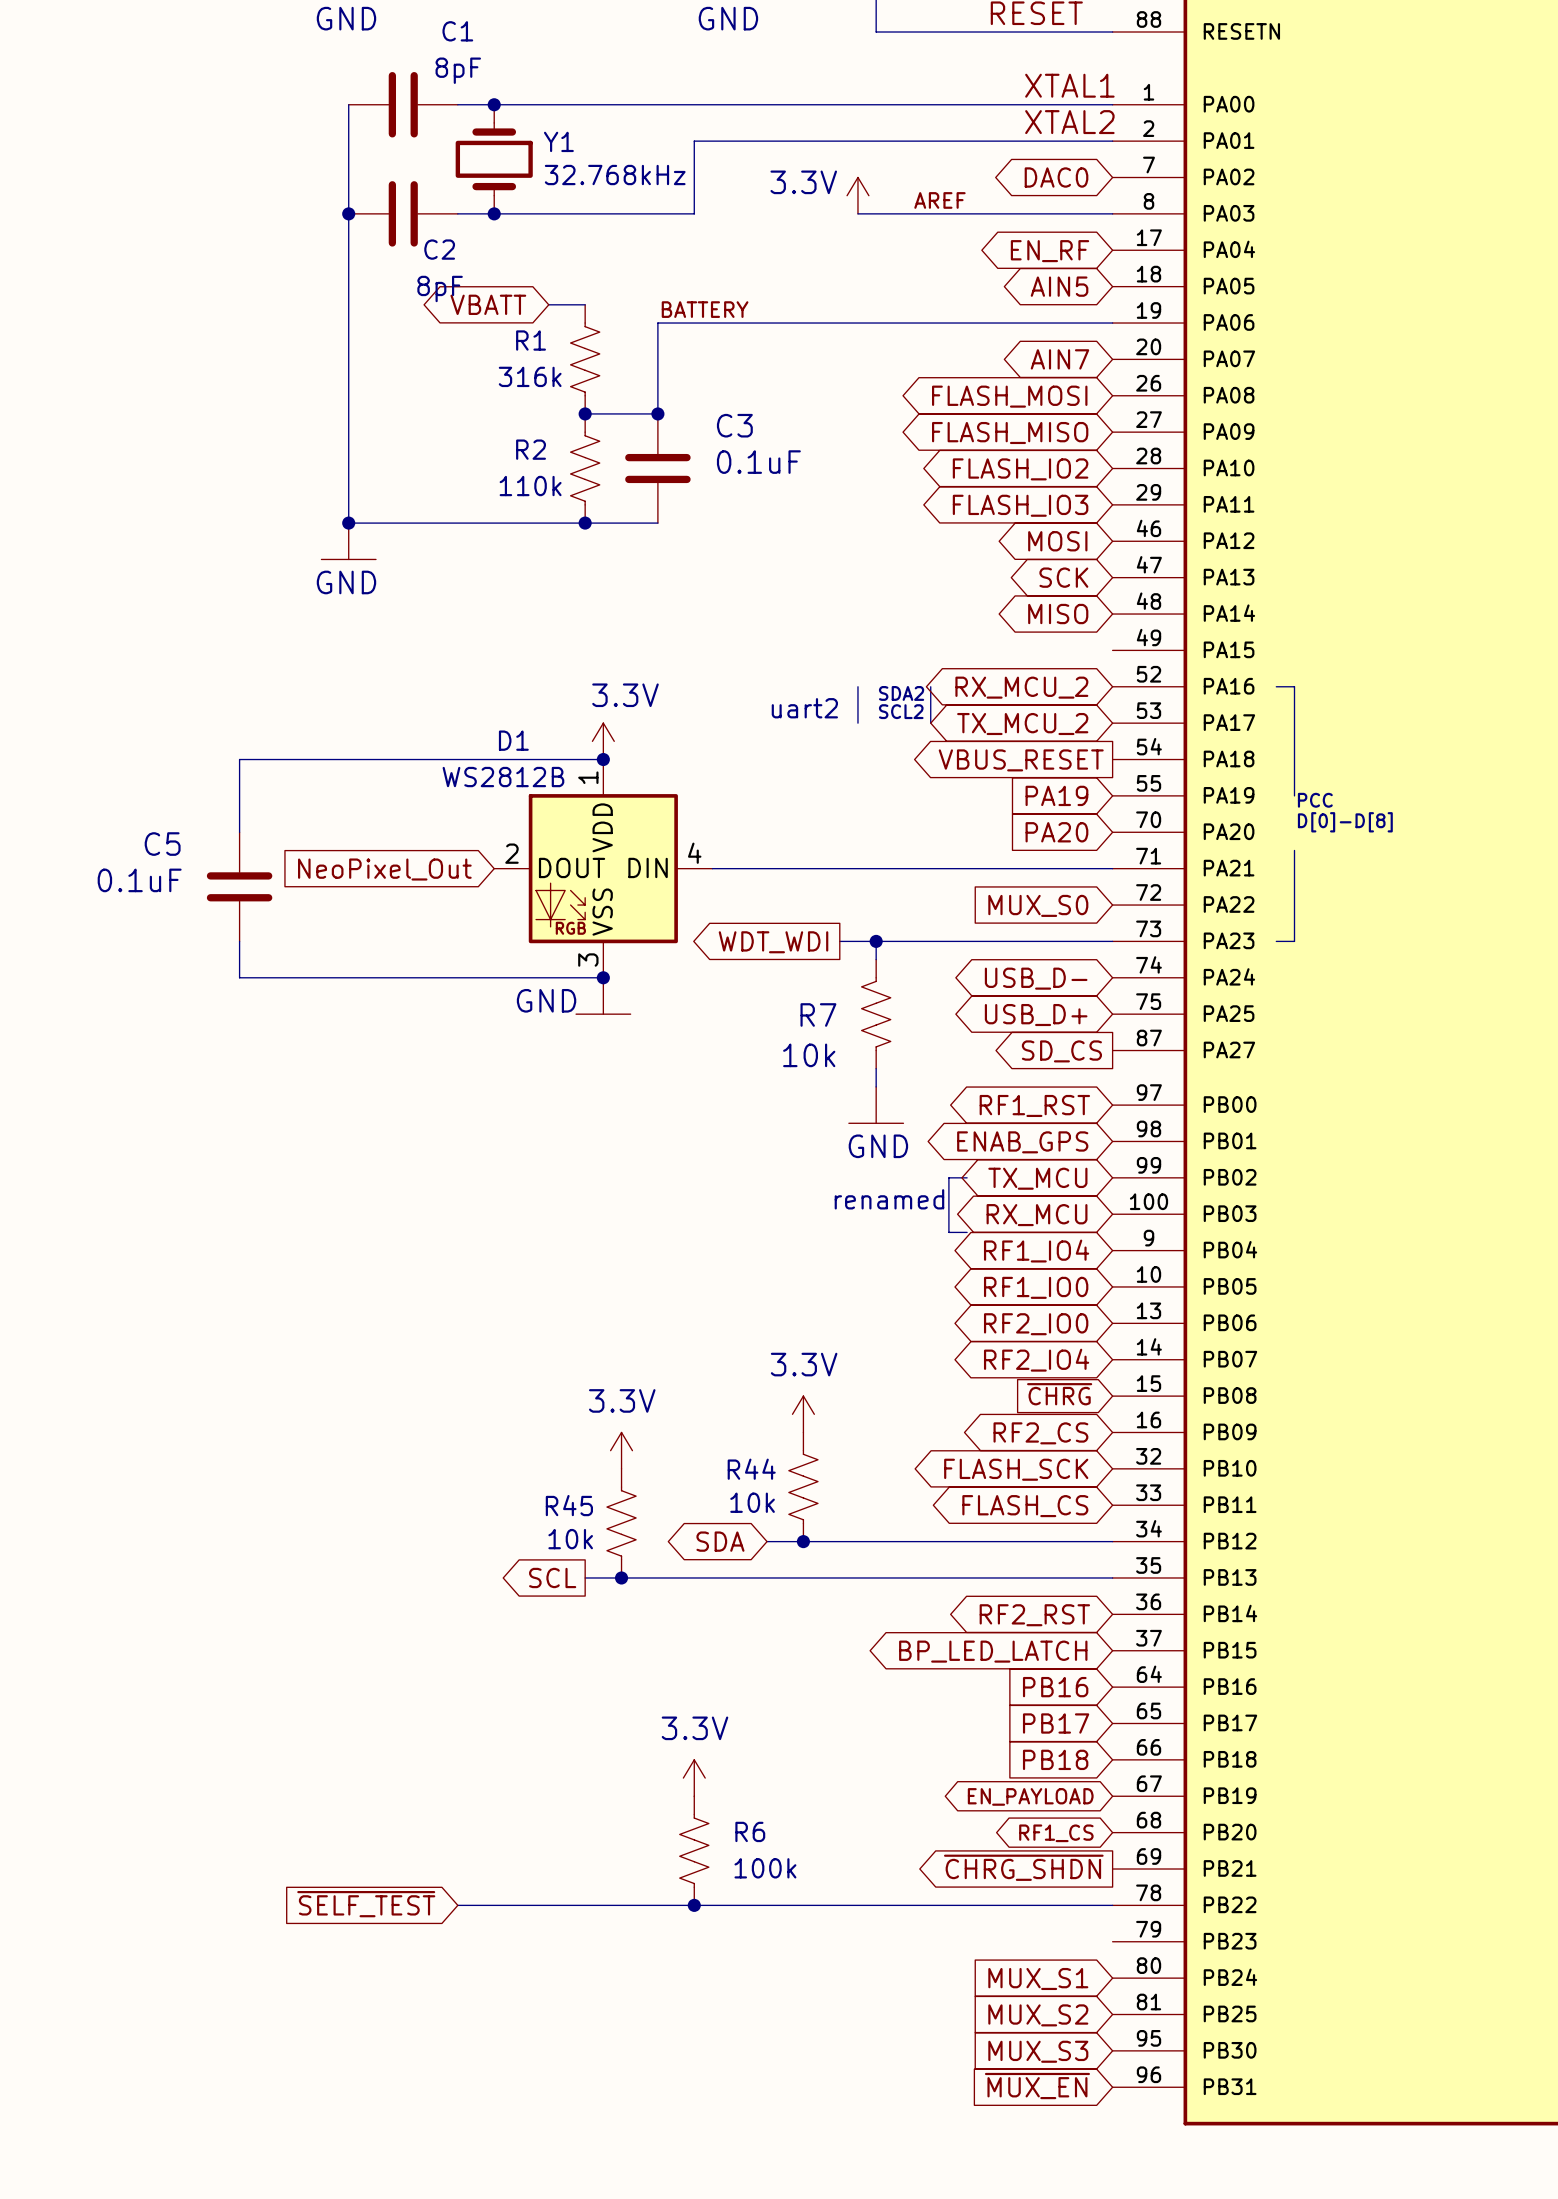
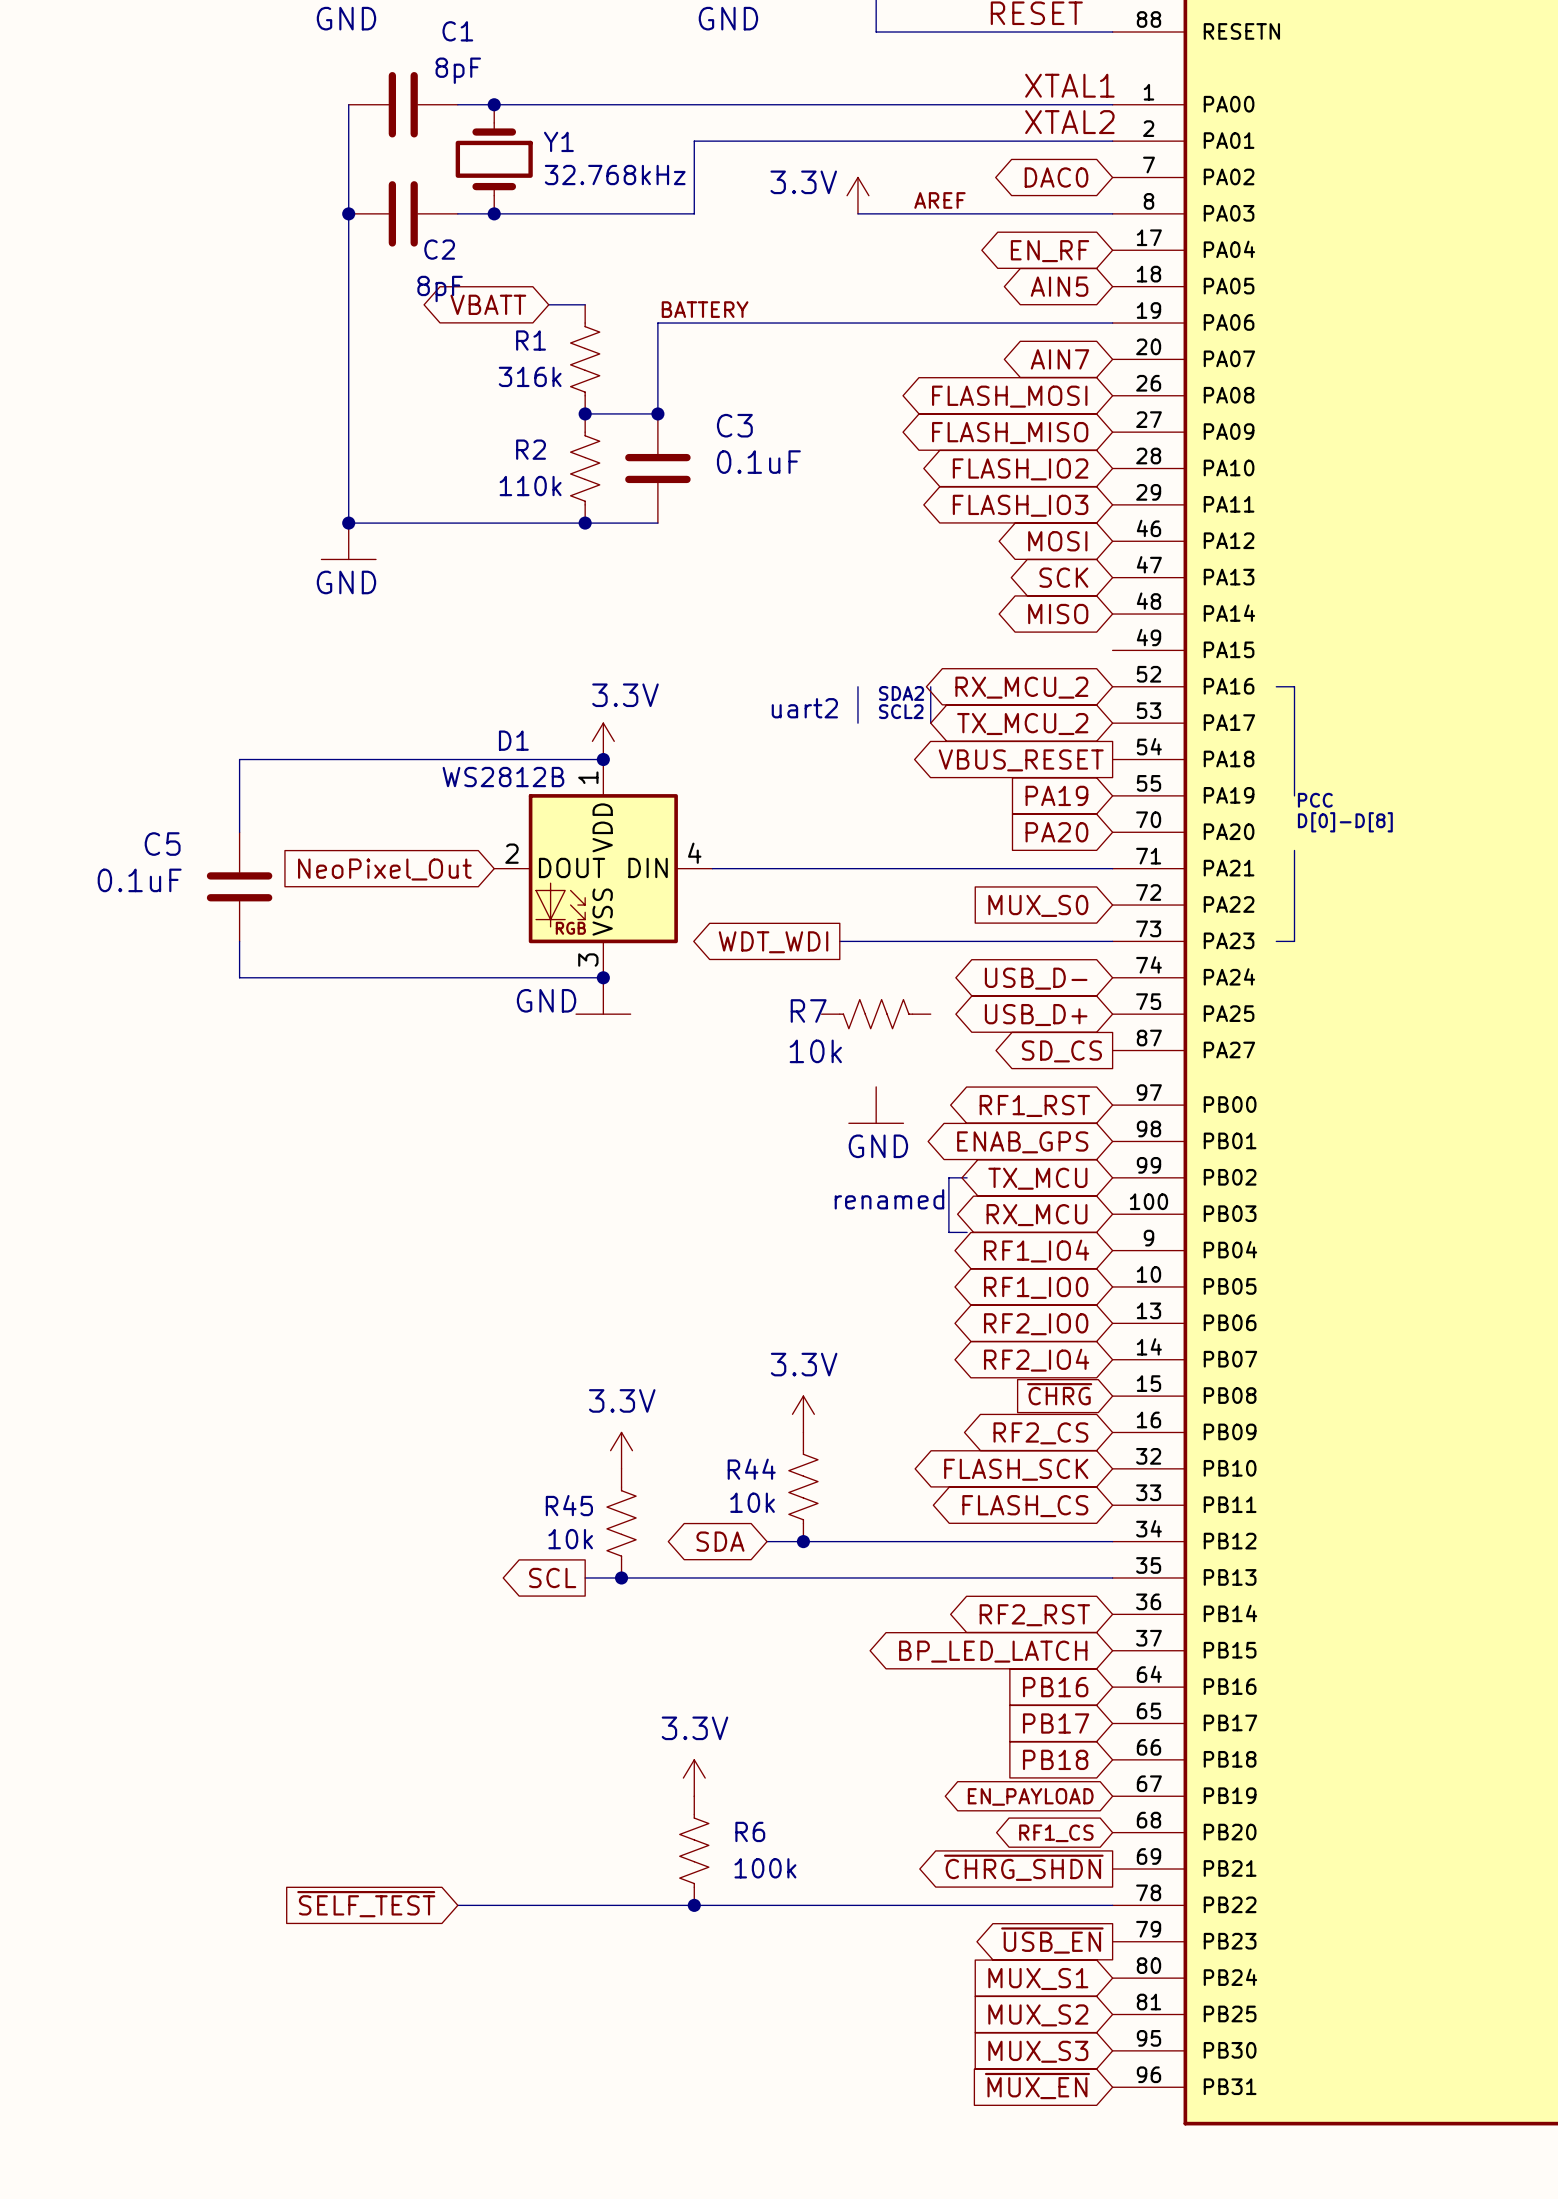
wire: (876, 941) (876, 959) -> none
junction: (876, 941) -> none
R7 rotation: 0° (876, 1014) -> 90° clockwise (876, 1014)
wire: (876, 1068) (876, 1086) -> none
global label: none -> ~{USB_EN} (1052, 1940)

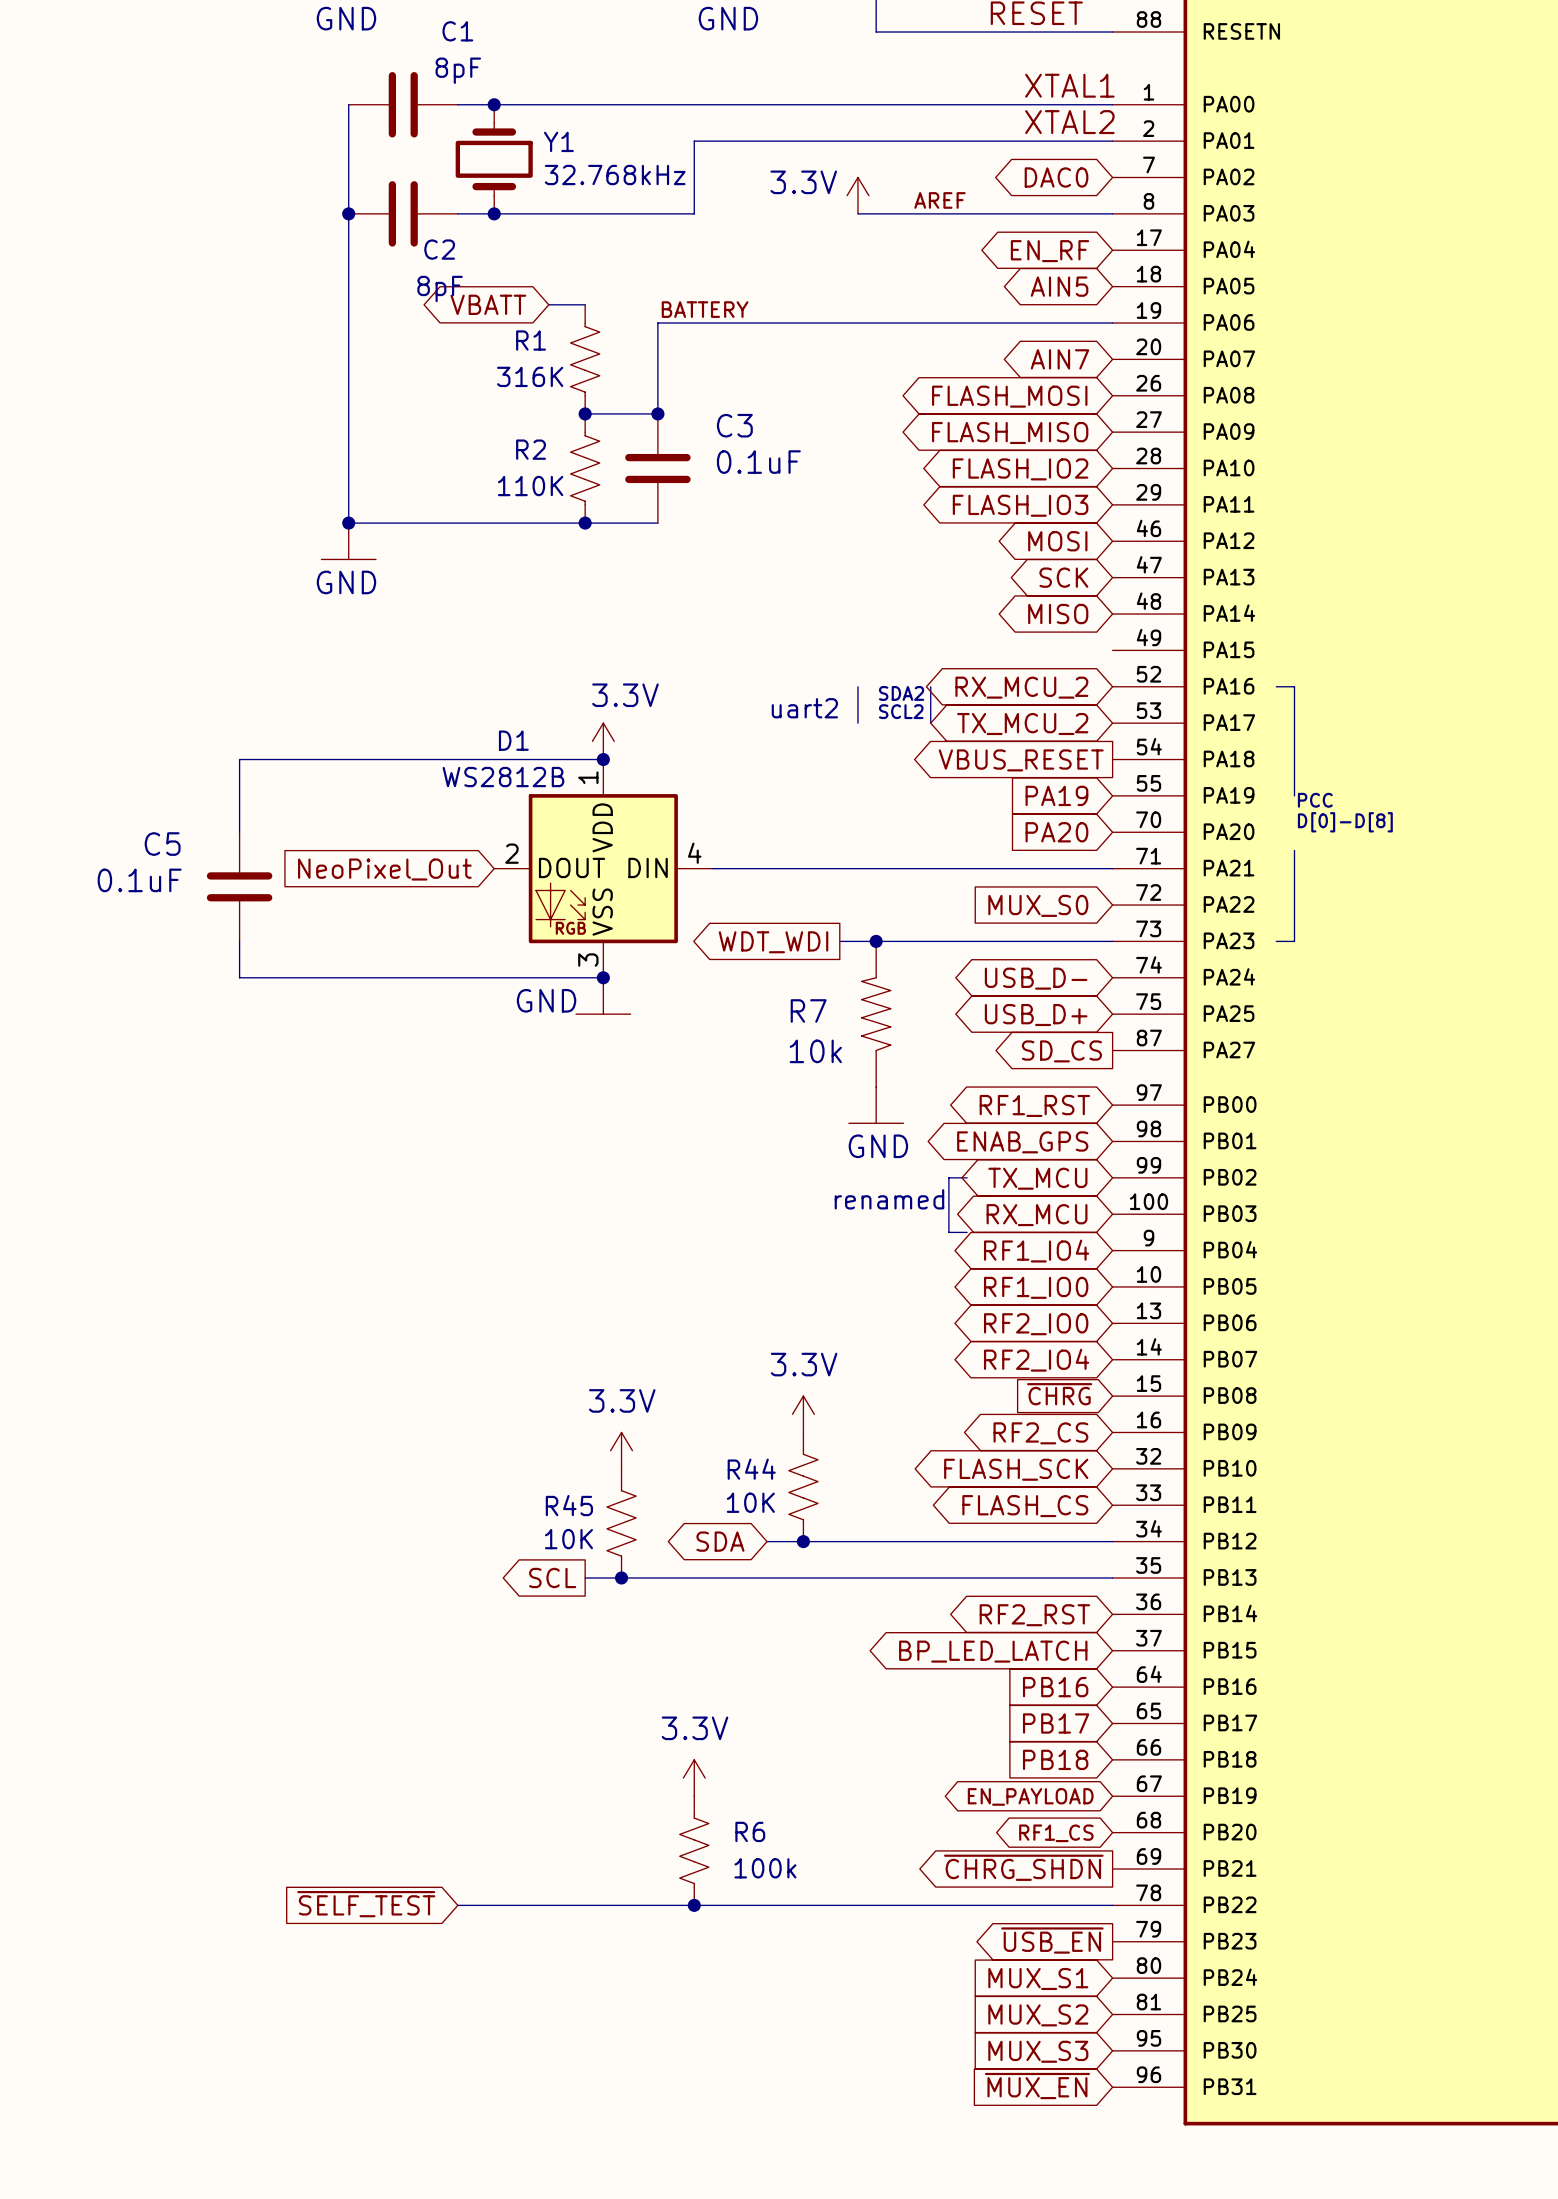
R1 value: 316k (530, 376) -> 316K (530, 376)
R2 value: 110k (530, 486) -> 110K (530, 486)
junction: none -> (876, 941)
R7 symbol: [821, 999, 931, 1029] -> [861, 941, 891, 1087]
R44 value: 10k (752, 1502) -> 10K (750, 1502)
R45 value: 10k (570, 1539) -> 10K (568, 1539)

